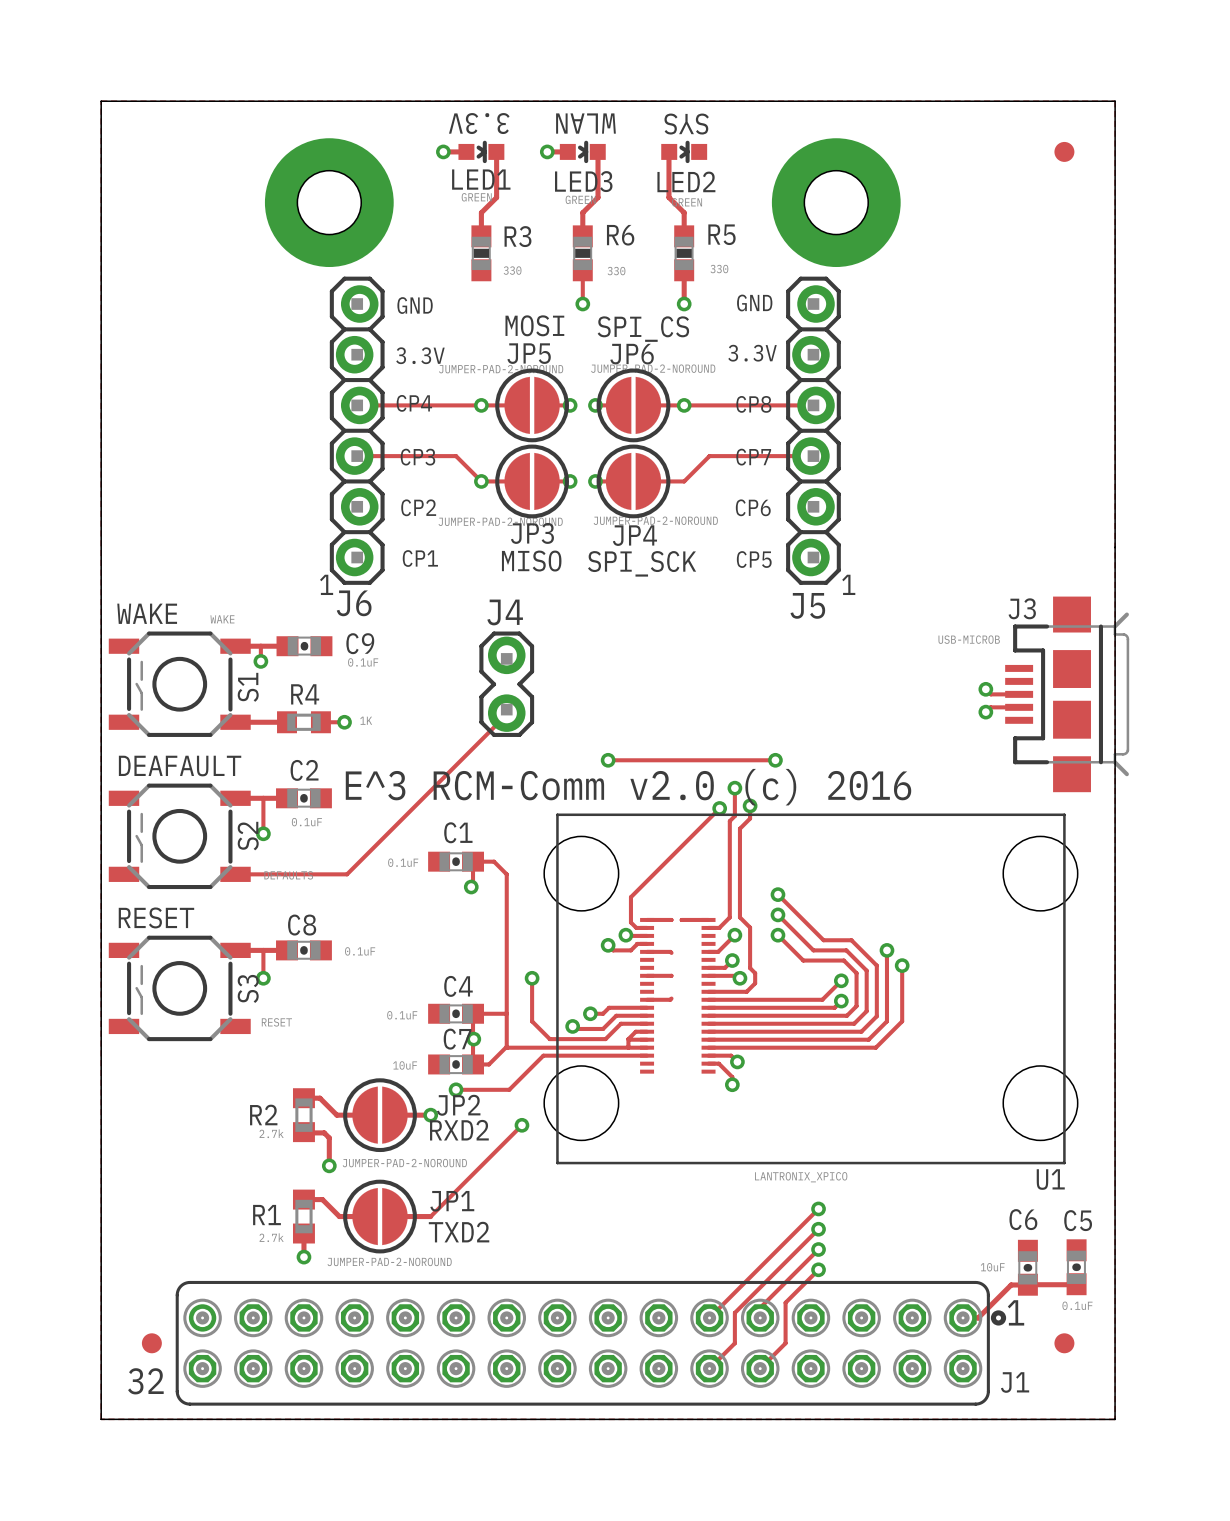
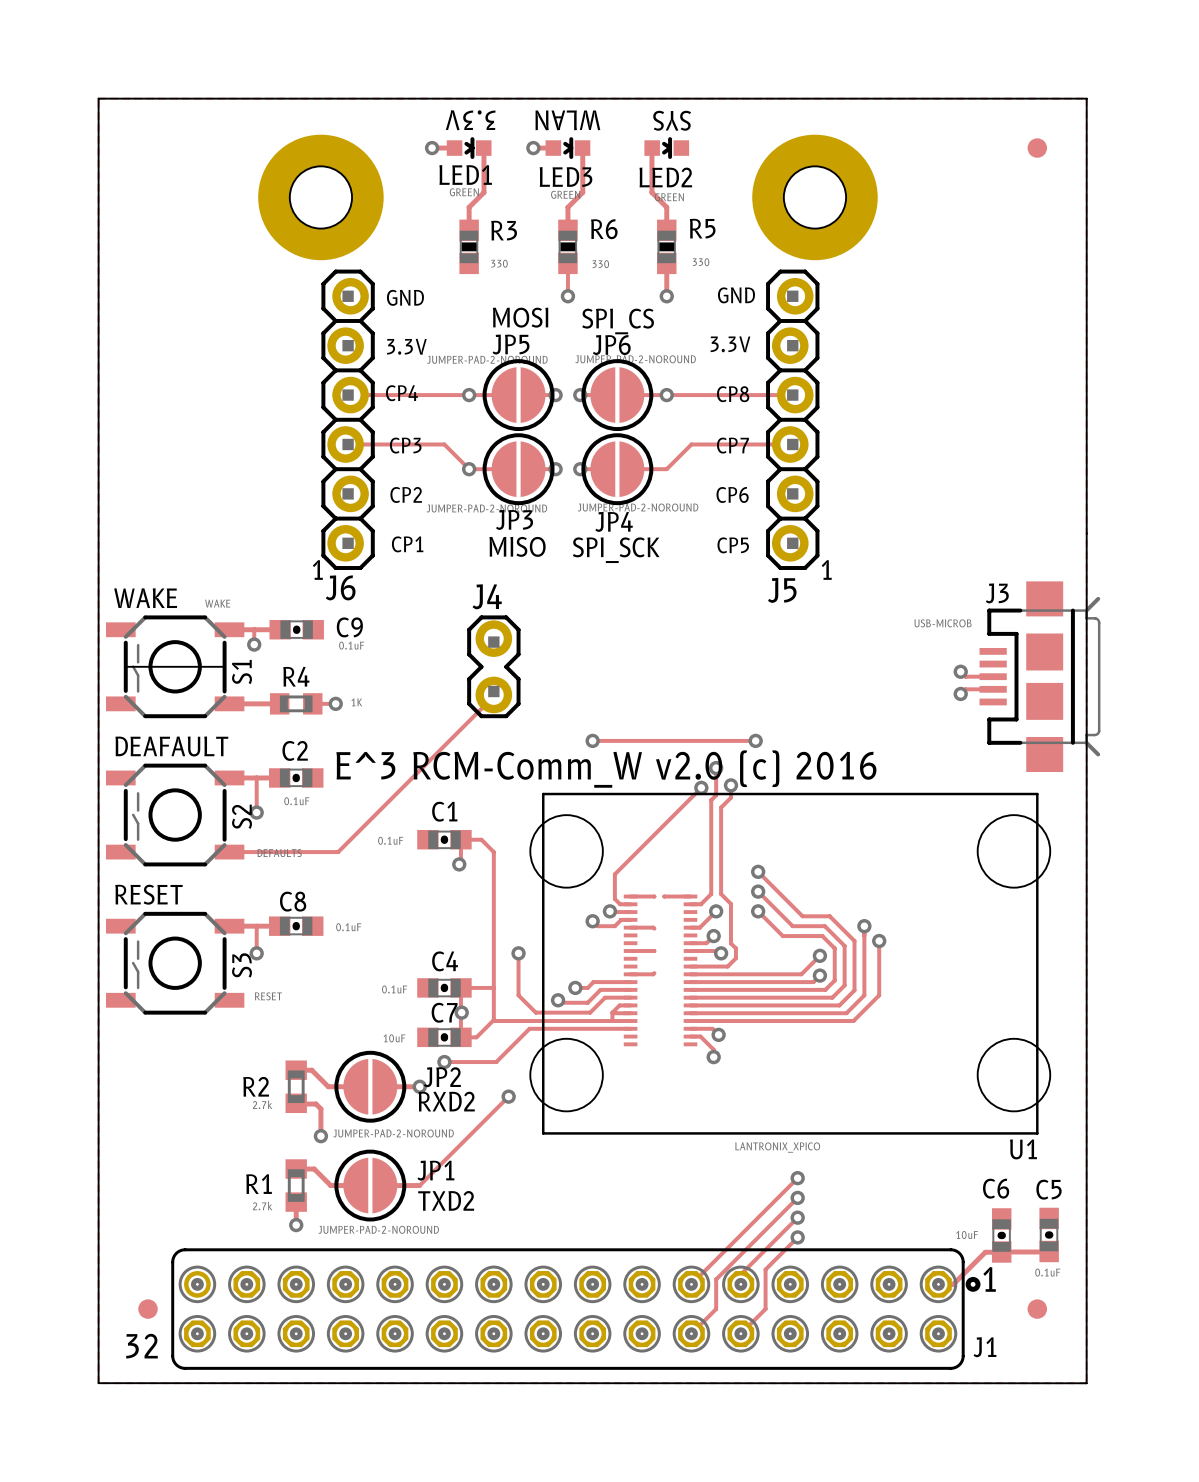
line: none -> (125, 666) (224, 666)
text: E^3 RCM-Comm v2.0 (c) 2016 (628, 787) -> E^3 RCM-Comm_W v2.0 (c) 2016 (606, 769)

